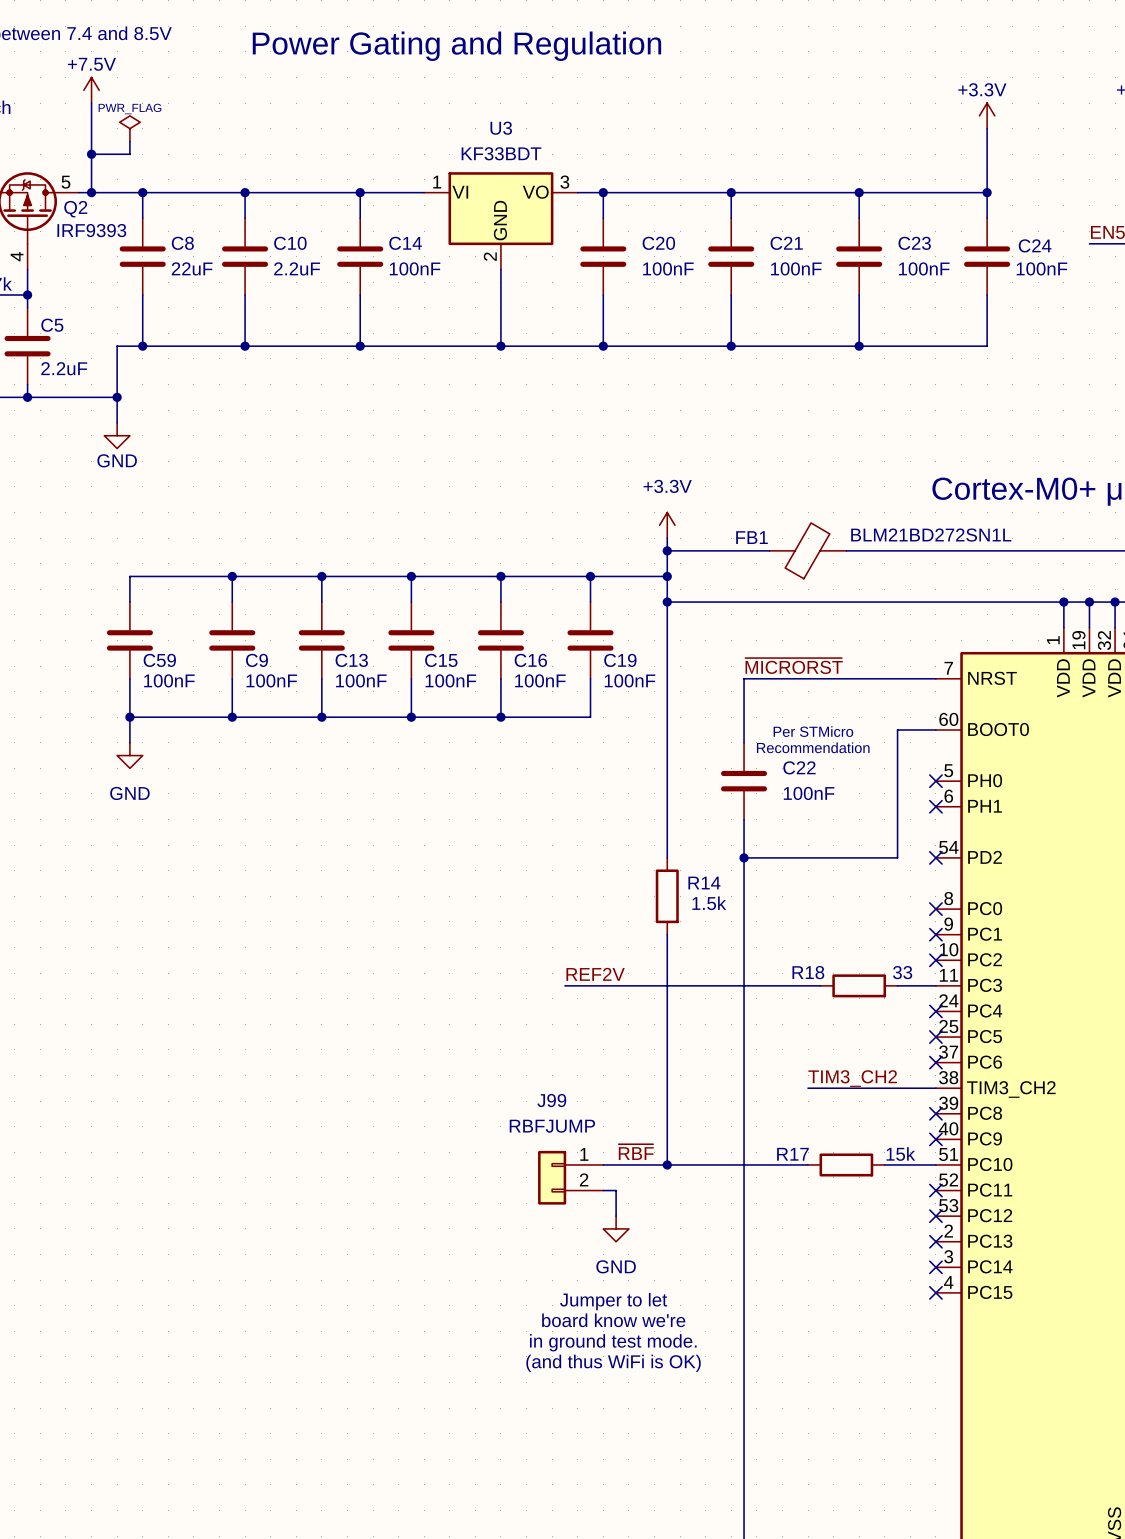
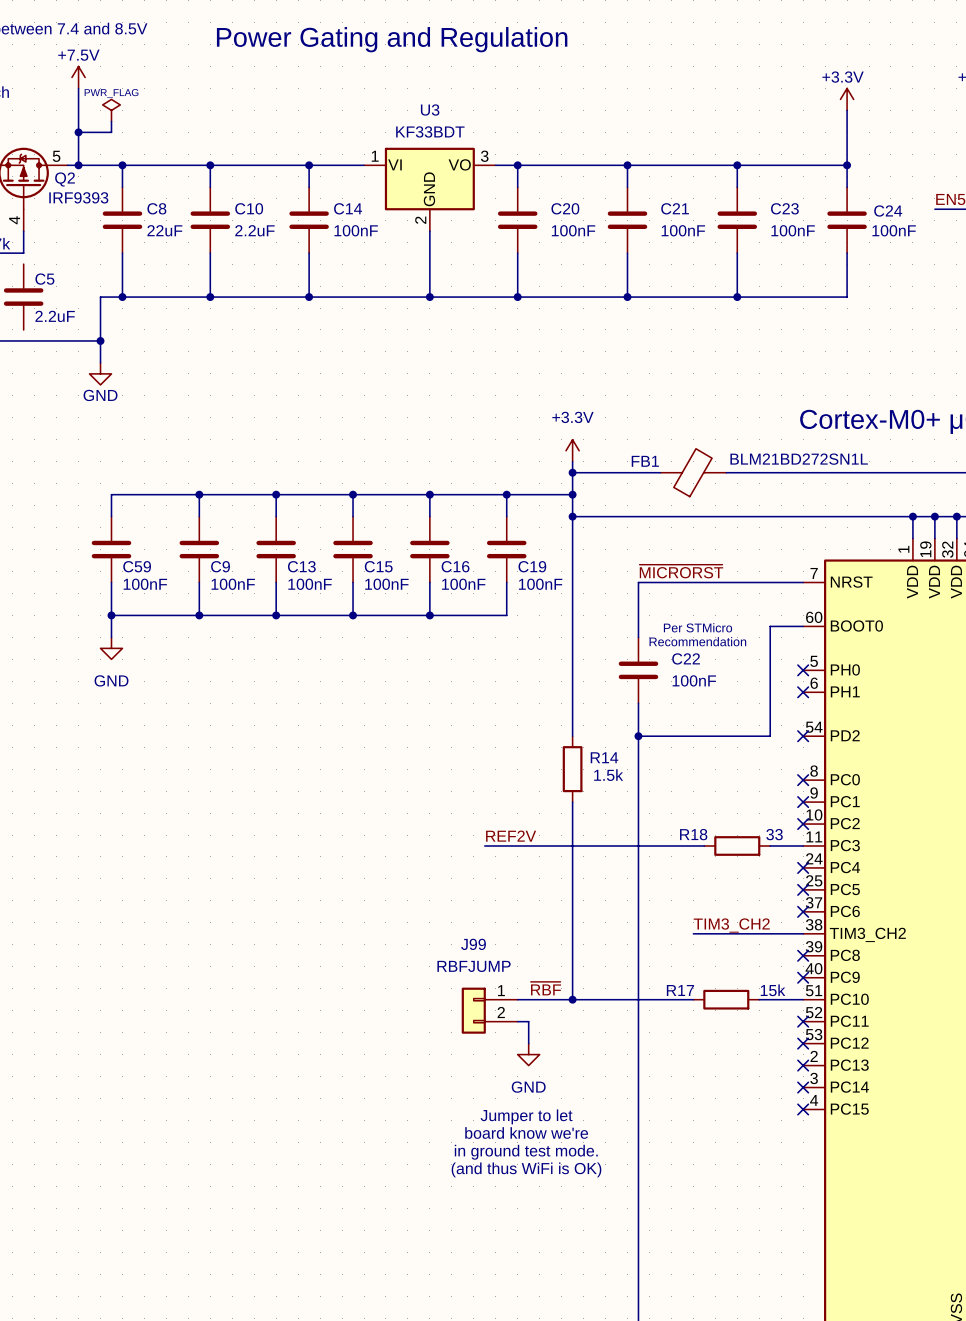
wire: (27, 294) (27, 307) -> none
junction: (27, 294) -> none
wire: (27, 384) (27, 397) -> none
junction: (27, 397) -> none

